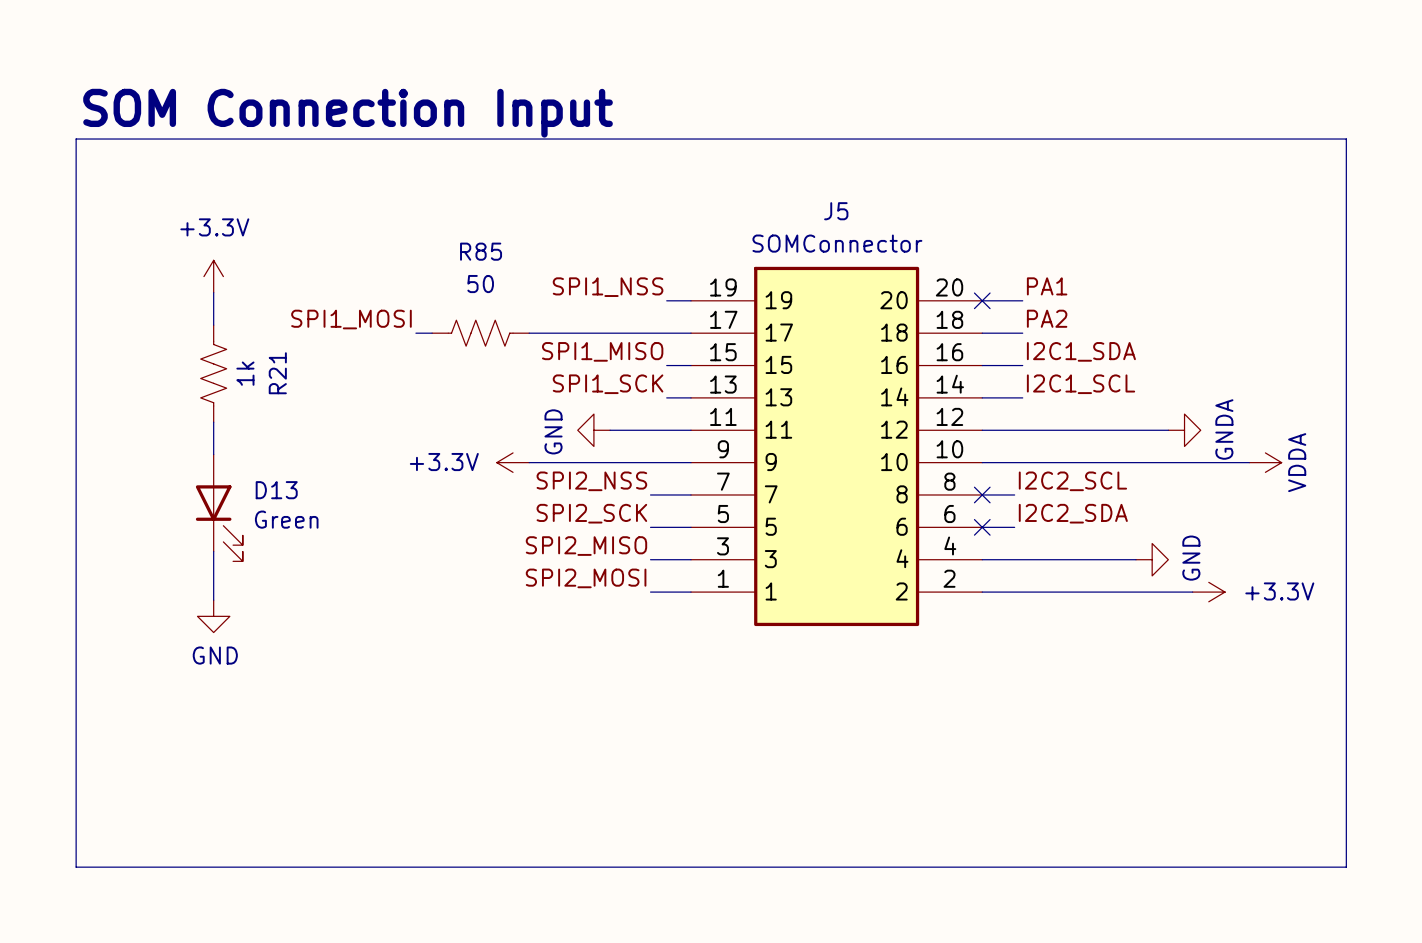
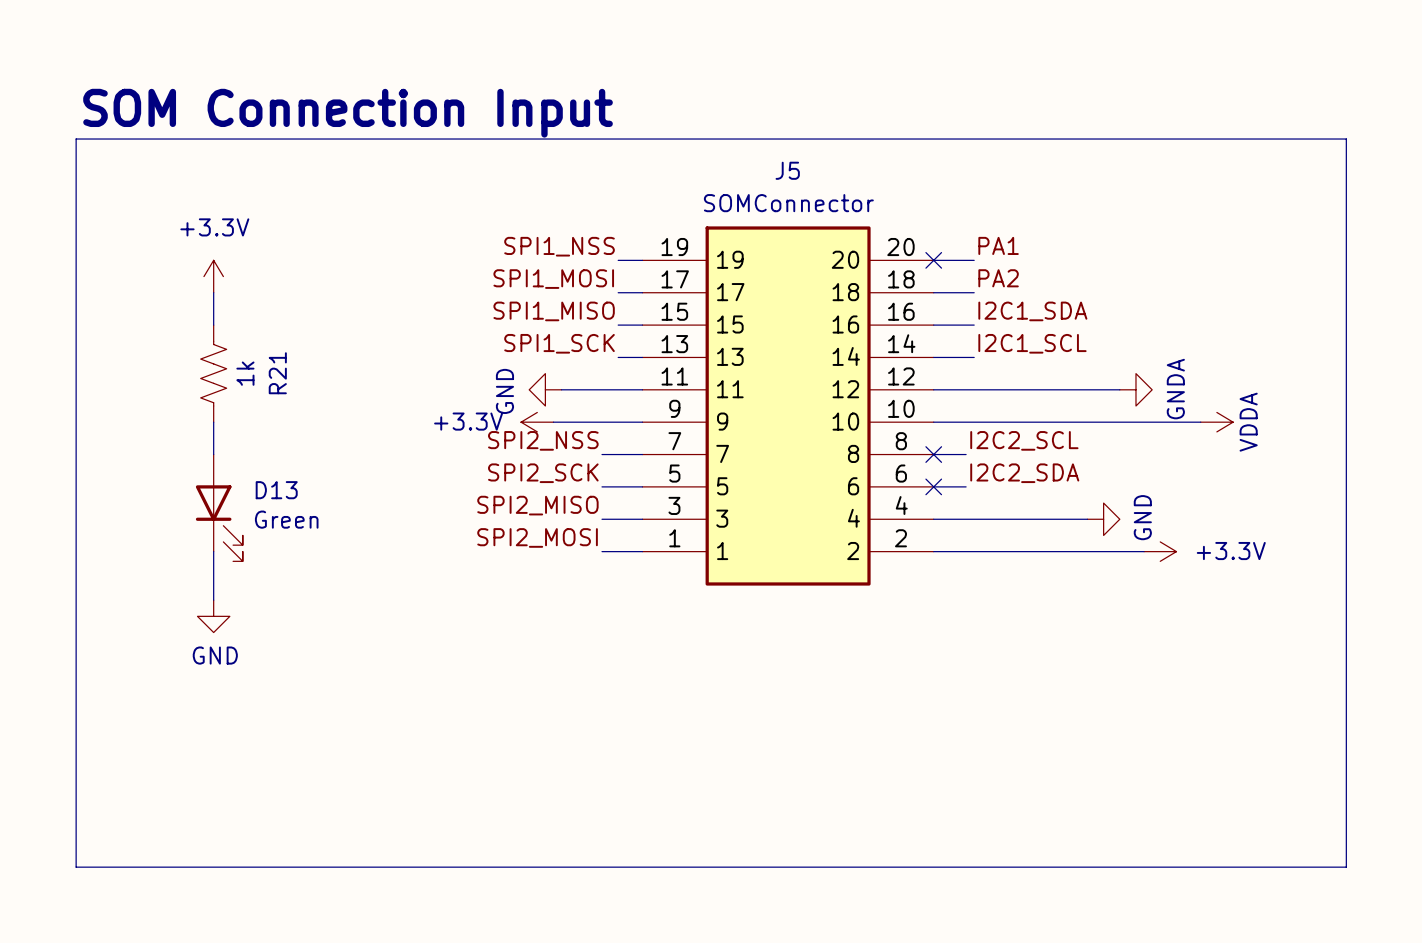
label position: PA1 (1047, 286) -> PA1 (998, 245)
label position: SPI1_NSS (608, 287) -> SPI1_NSS (559, 246)
wire: none -> (618, 292) (642, 292)
wire: (666, 300) (691, 300) -> (618, 260) (642, 260)
wire: (982, 300) (1022, 300) -> (933, 260) (974, 260)
no-connect mark position: (982, 300) -> (933, 260)
label position: PA2 (1047, 318) -> PA2 (998, 278)
label position: SPI1_MOSI (351, 319) -> SPI1_MOSI (553, 279)
wire: (415, 333) (432, 333) -> none
R85: 50 (480, 333) -> none
wire: (529, 333) (691, 333) -> none
wire: (982, 333) (1022, 333) -> (933, 292) (974, 292)
label position: SPI1_MISO (602, 351) -> SPI1_MISO (554, 311)
label position: I2C1_SDA (1081, 351) -> I2C1_SDA (1032, 311)
wire: (666, 365) (691, 365) -> (618, 325) (642, 325)
wire: (982, 365) (1022, 365) -> (933, 325) (974, 325)
label position: SPI1_SCK (608, 384) -> SPI1_SCK (559, 343)
label position: I2C1_SCL (1081, 384) -> I2C1_SCL (1032, 343)
wire: (666, 397) (691, 397) -> (618, 357) (642, 357)
wire: (982, 397) (1022, 397) -> (933, 357) (974, 357)
wire: none -> (553, 422) (642, 422)
power symbol position: GND (593, 430) -> GND (545, 389)
wire: (610, 430) (691, 430) -> (561, 389) (642, 389)
wire: (982, 430) (1168, 430) -> (933, 389) (1119, 389)
power symbol position: GNDA (1184, 430) -> GNDA (1135, 389)
J5 position: (836, 446) -> (788, 405)
no-connect mark: none -> (933, 454)
power symbol position: +3.3V (513, 462) -> +3.3V (537, 422)
wire: (529, 462) (691, 462) -> none
wire: (982, 462) (1249, 462) -> (933, 422) (1200, 422)
power symbol position: VDDA (1265, 462) -> VDDA (1216, 422)
label position: SPI2_NSS (591, 481) -> SPI2_NSS (543, 440)
label position: I2C2_SCL (1072, 481) -> I2C2_SCL (1024, 440)
no-connect mark: none -> (933, 486)
wire: (650, 494) (691, 494) -> (602, 454) (642, 454)
wire: (982, 494) (1014, 494) -> (933, 454) (966, 454)
no-connect mark: (982, 494) -> none
label position: SPI2_SCK (591, 513) -> SPI2_SCK (543, 473)
label position: I2C2_SDA (1073, 513) -> I2C2_SDA (1024, 473)
power symbol: none -> GND (1103, 519)
wire: (650, 527) (691, 527) -> (602, 486) (642, 486)
wire: (982, 527) (1014, 527) -> (933, 486) (966, 486)
no-connect mark: (982, 527) -> none
label position: SPI2_MISO (586, 546) -> SPI2_MISO (537, 505)
wire: (650, 559) (691, 559) -> (602, 519) (642, 519)
wire: (982, 559) (1135, 559) -> (933, 519) (1087, 519)
power symbol: GND (1152, 559) -> +3.3V (1160, 551)
label position: SPI2_MOSI (586, 578) -> SPI2_MOSI (537, 537)
wire: (650, 592) (691, 592) -> (602, 551) (642, 551)
wire: (982, 592) (1192, 592) -> (933, 551) (1144, 551)
power symbol: +3.3V (1208, 592) -> none

